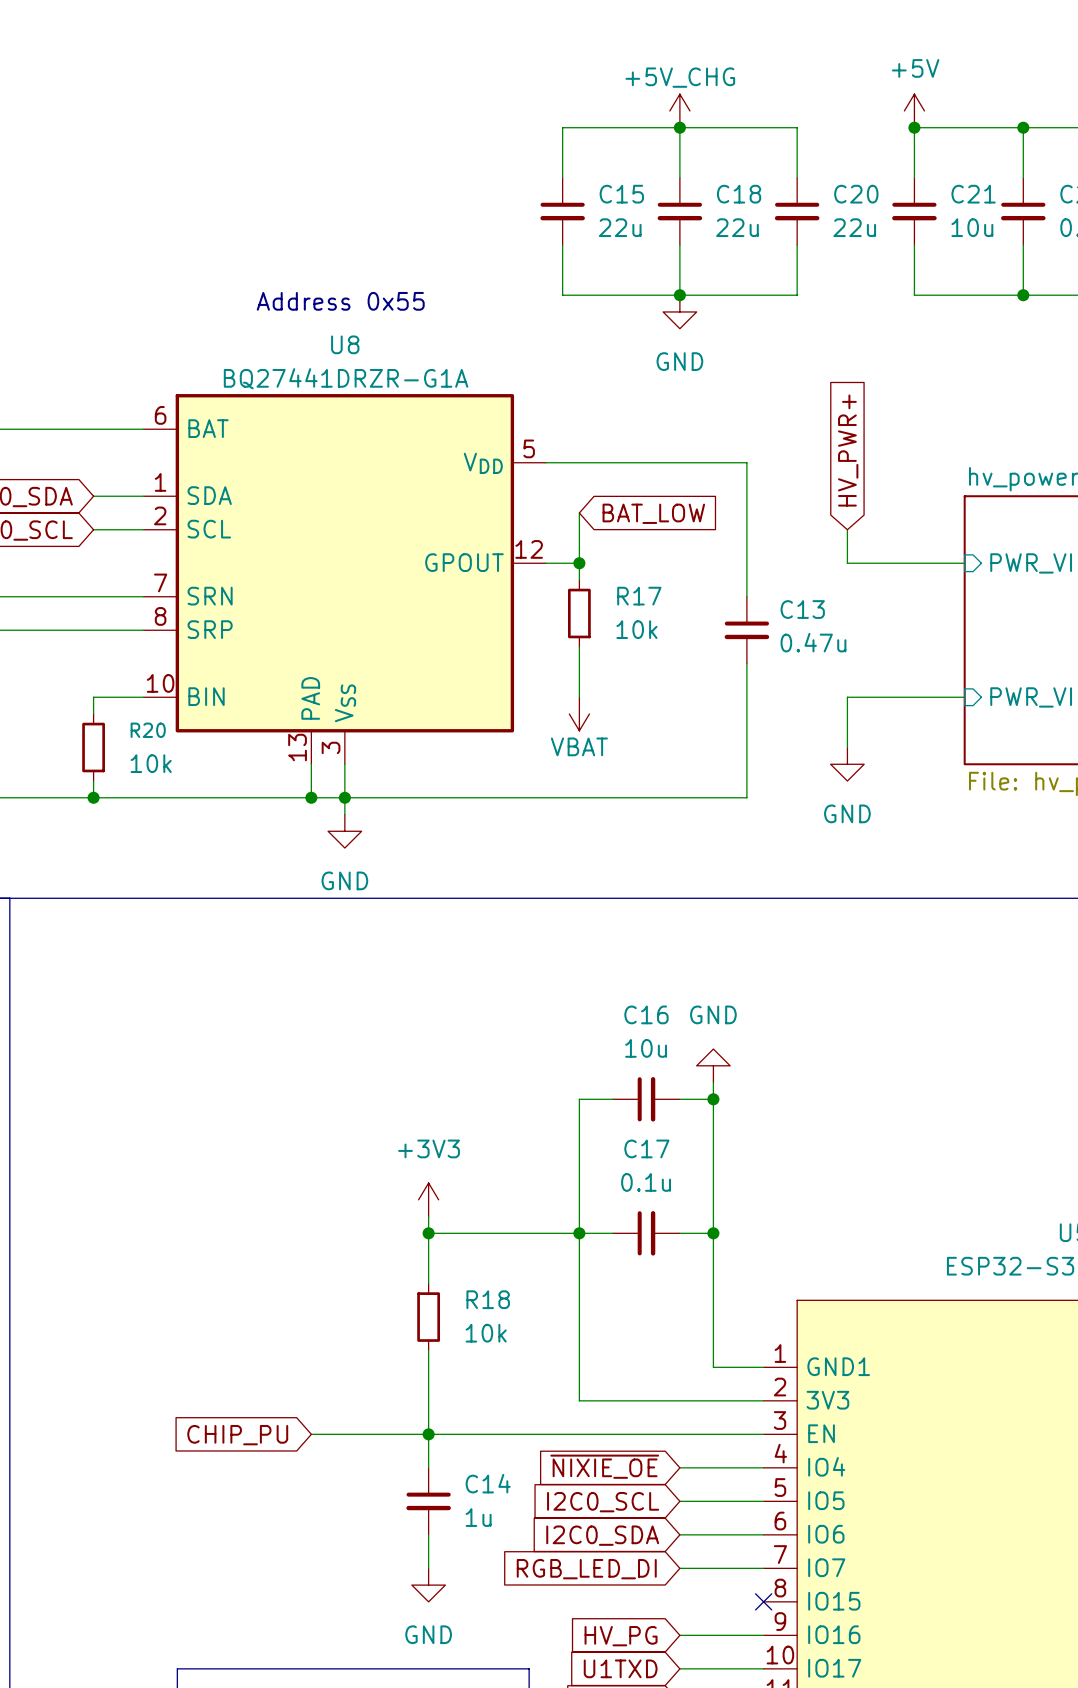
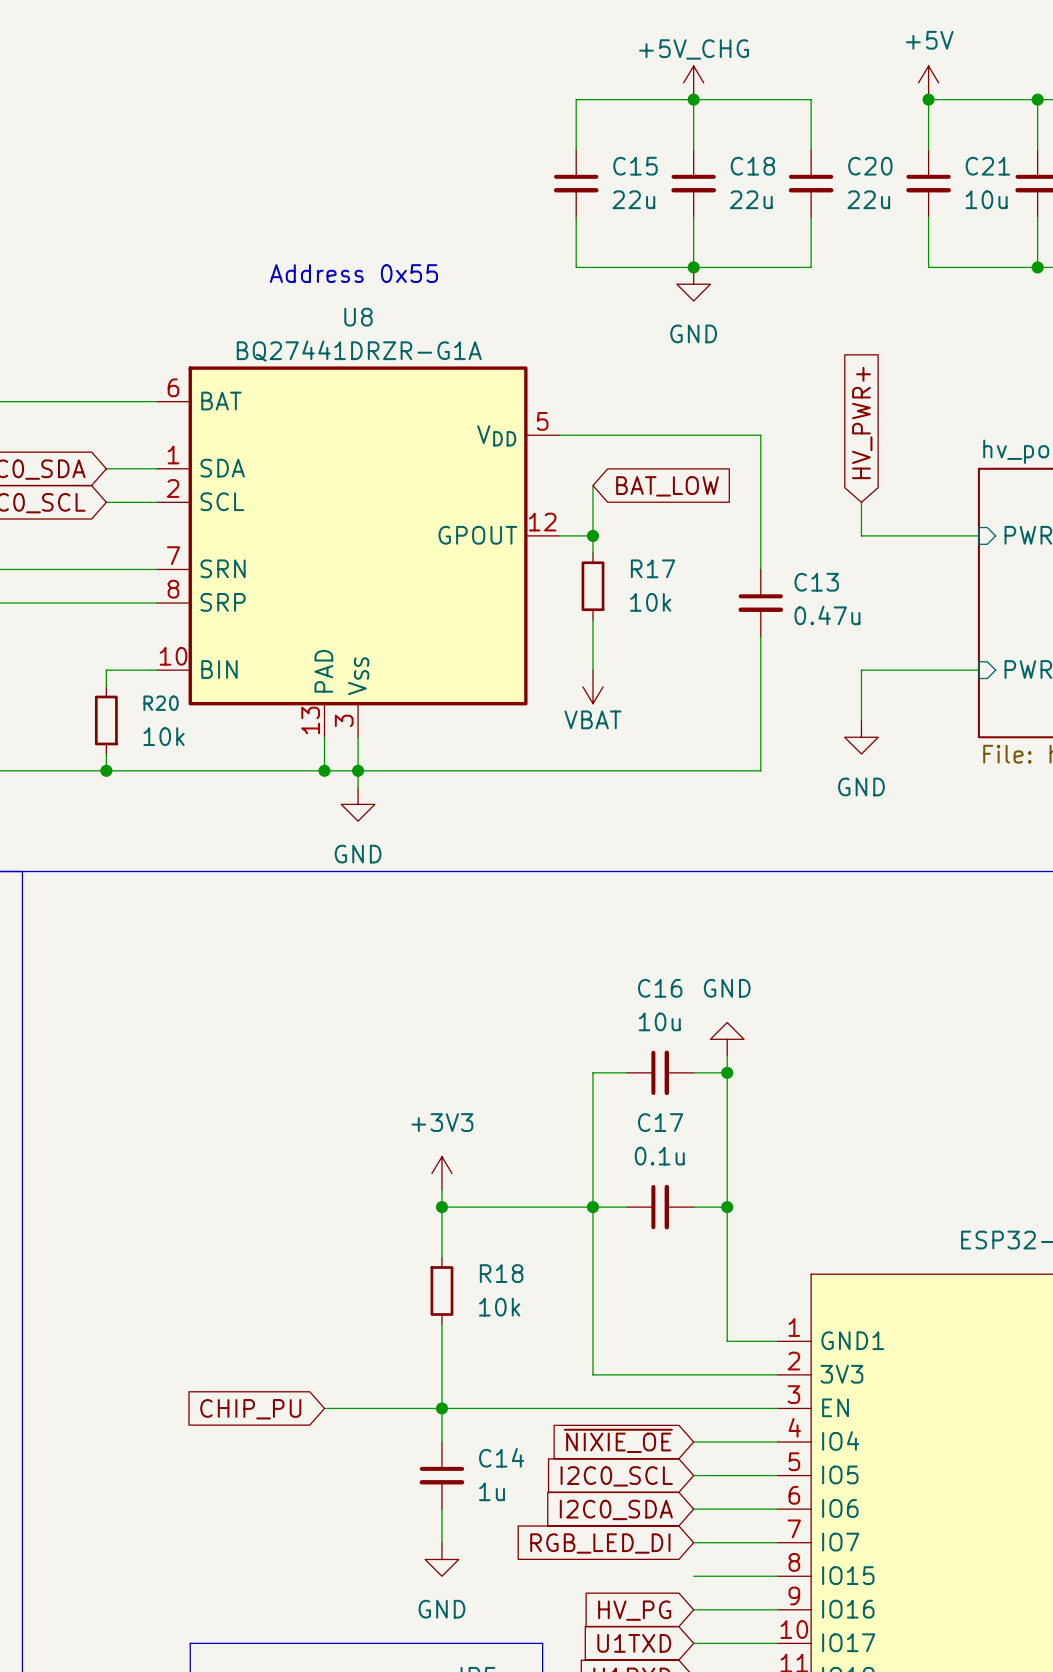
wire: none -> (693, 1576) (777, 1576)
no-connect mark: (763, 1601) -> none

